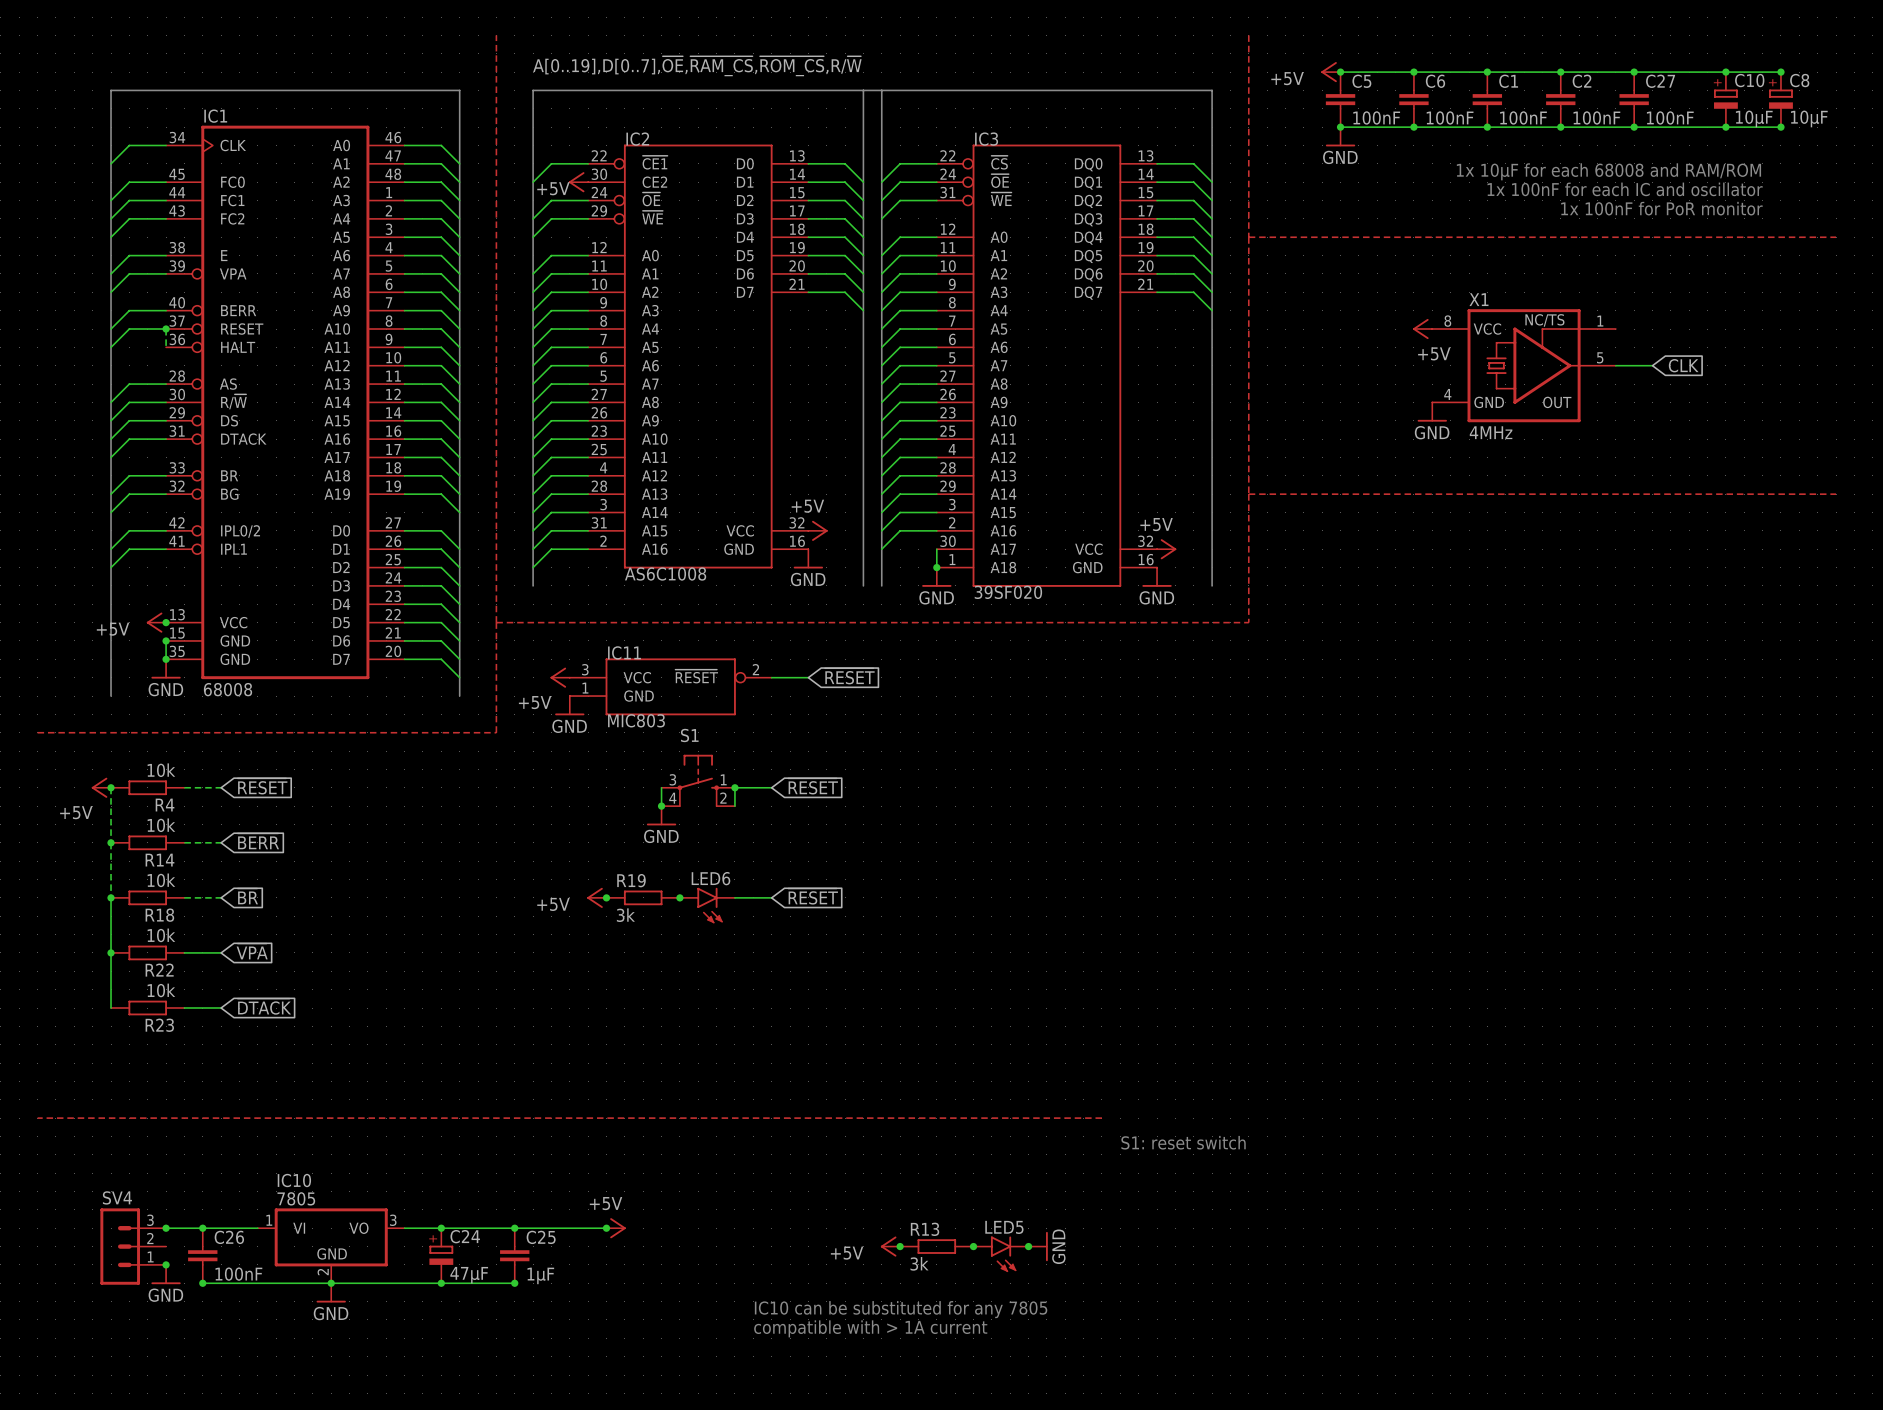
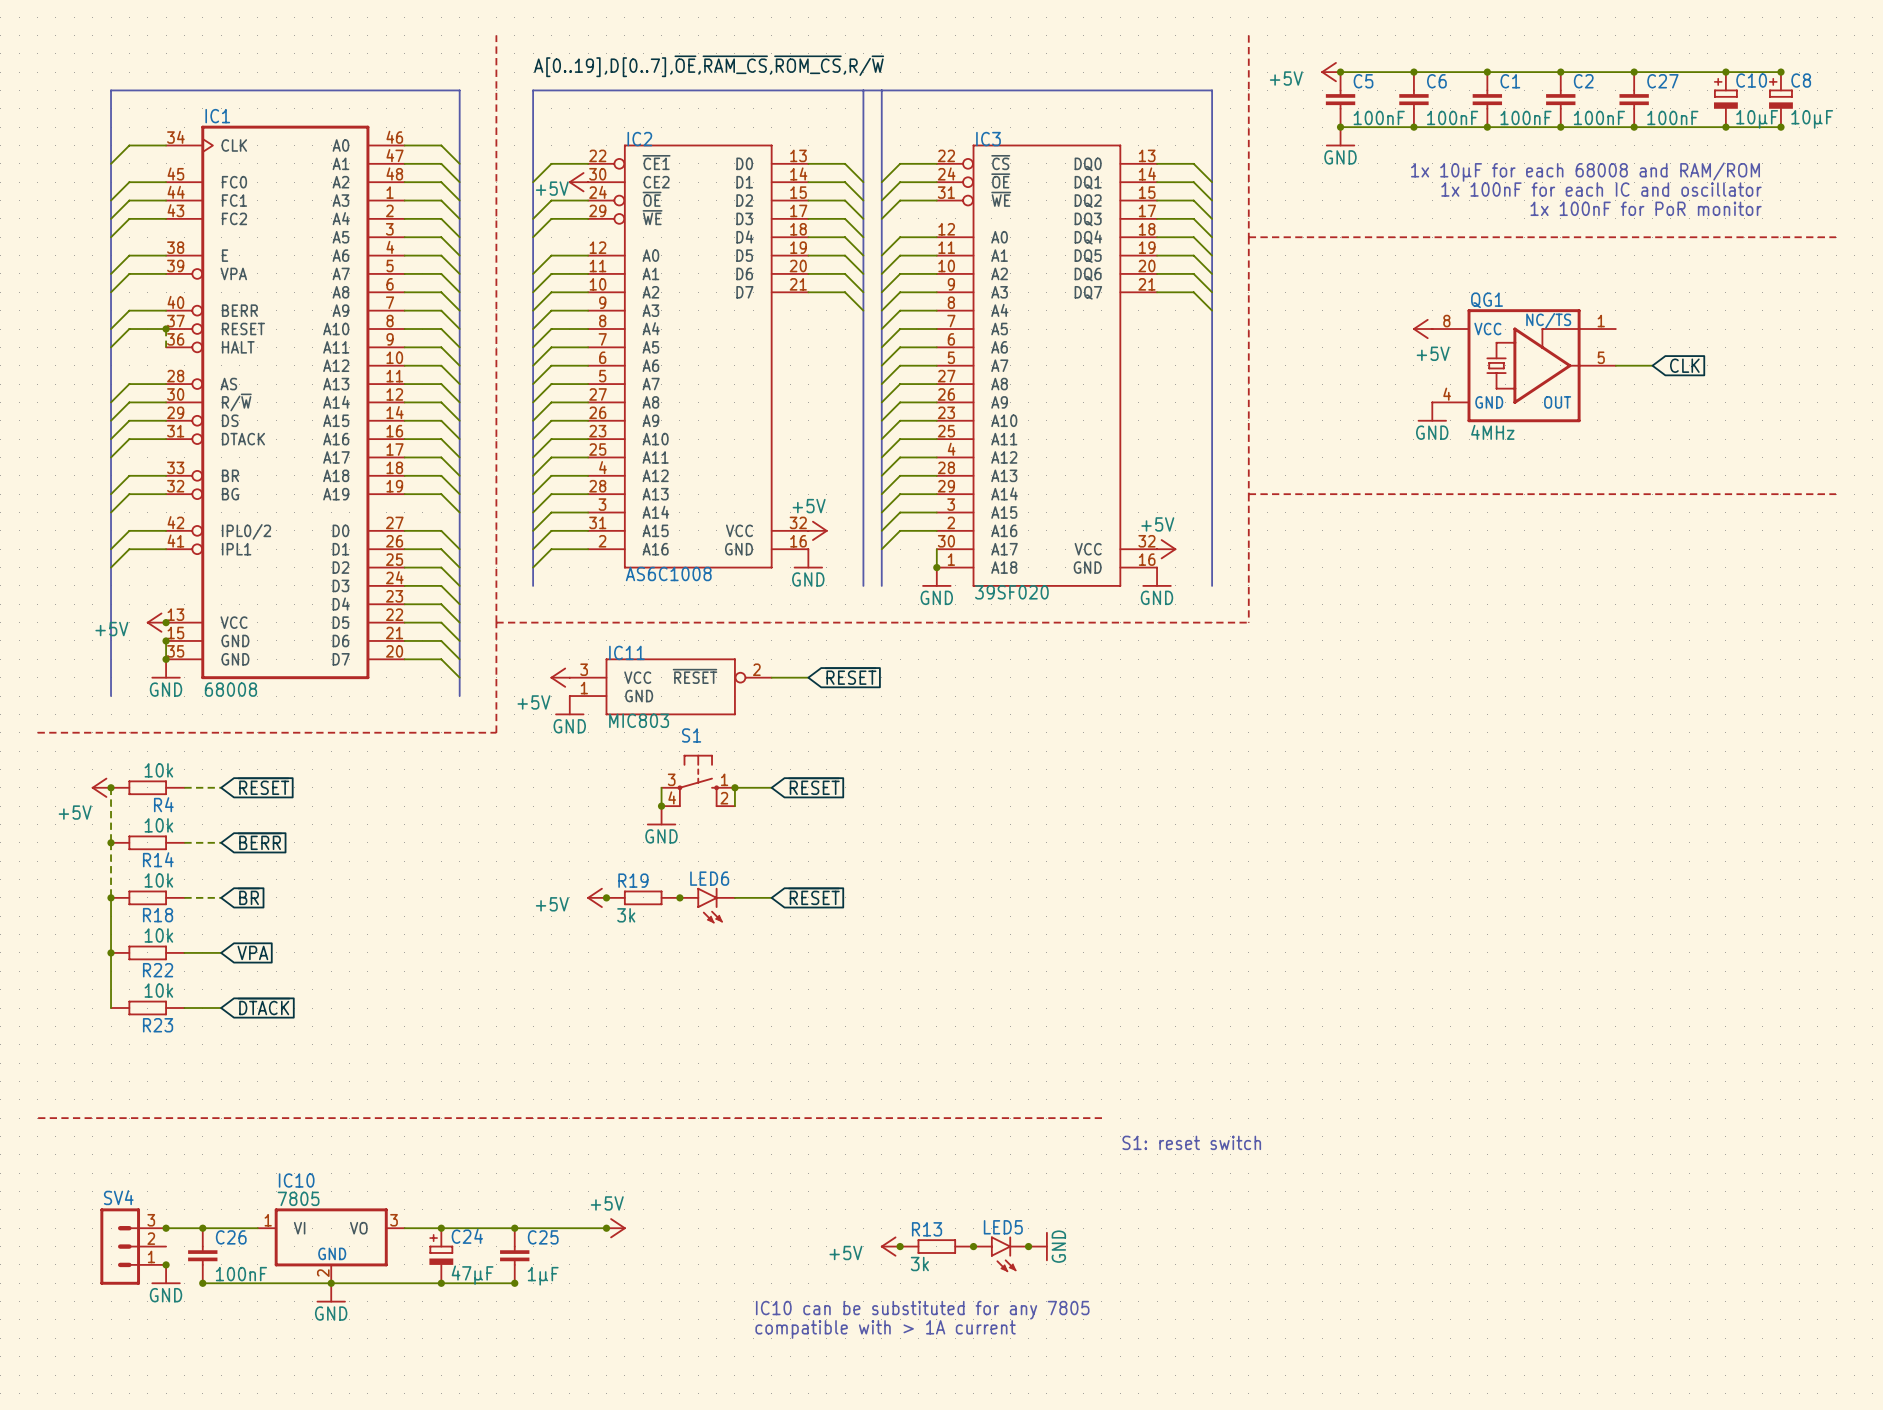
X1 name: X1 (1478, 299) -> QG1 (1487, 300)
global label: ~{VPA} (252, 951) -> VPA (252, 952)

